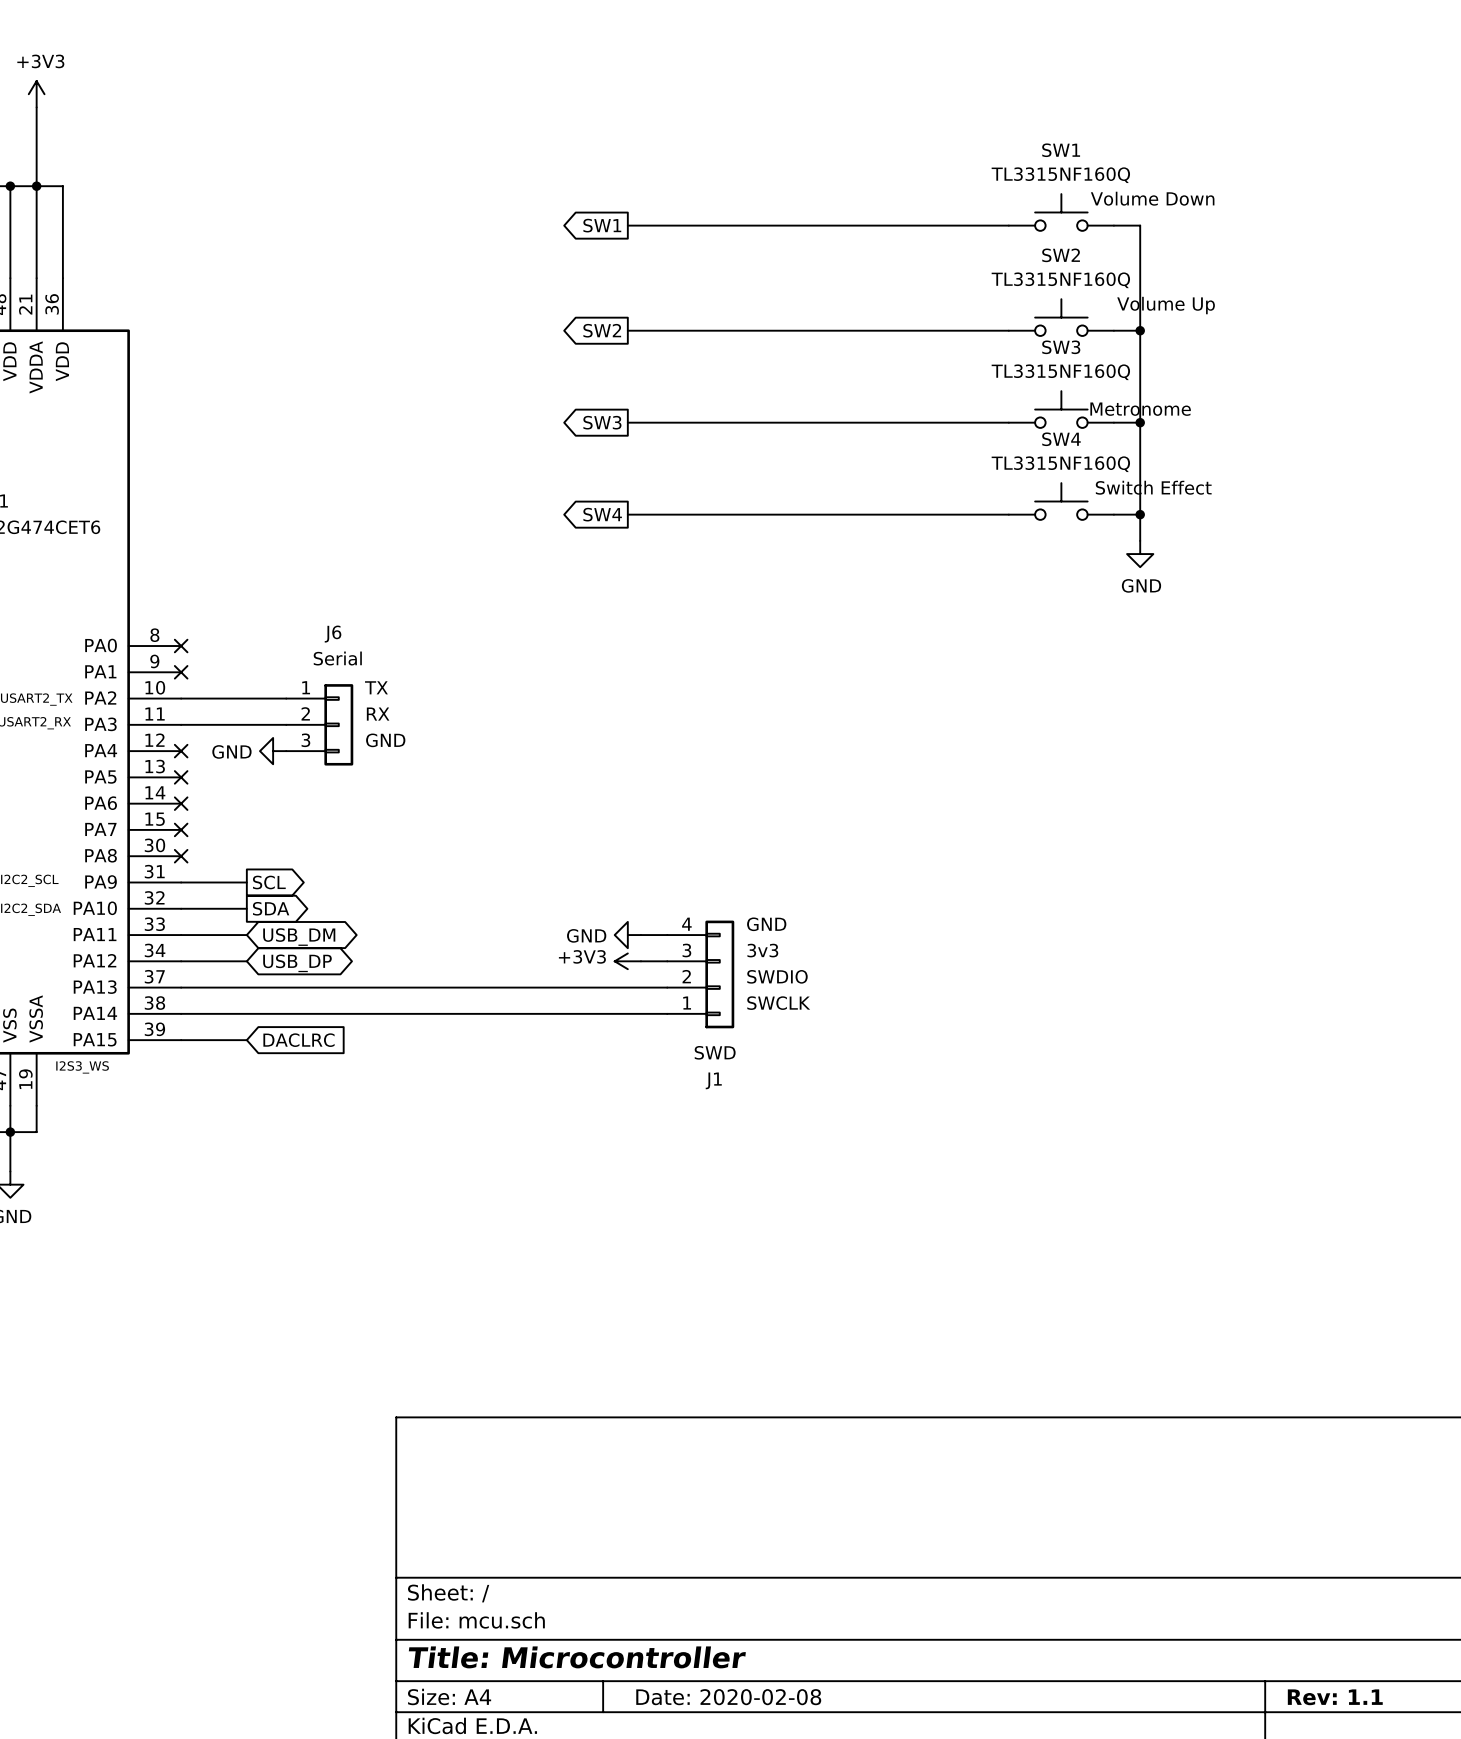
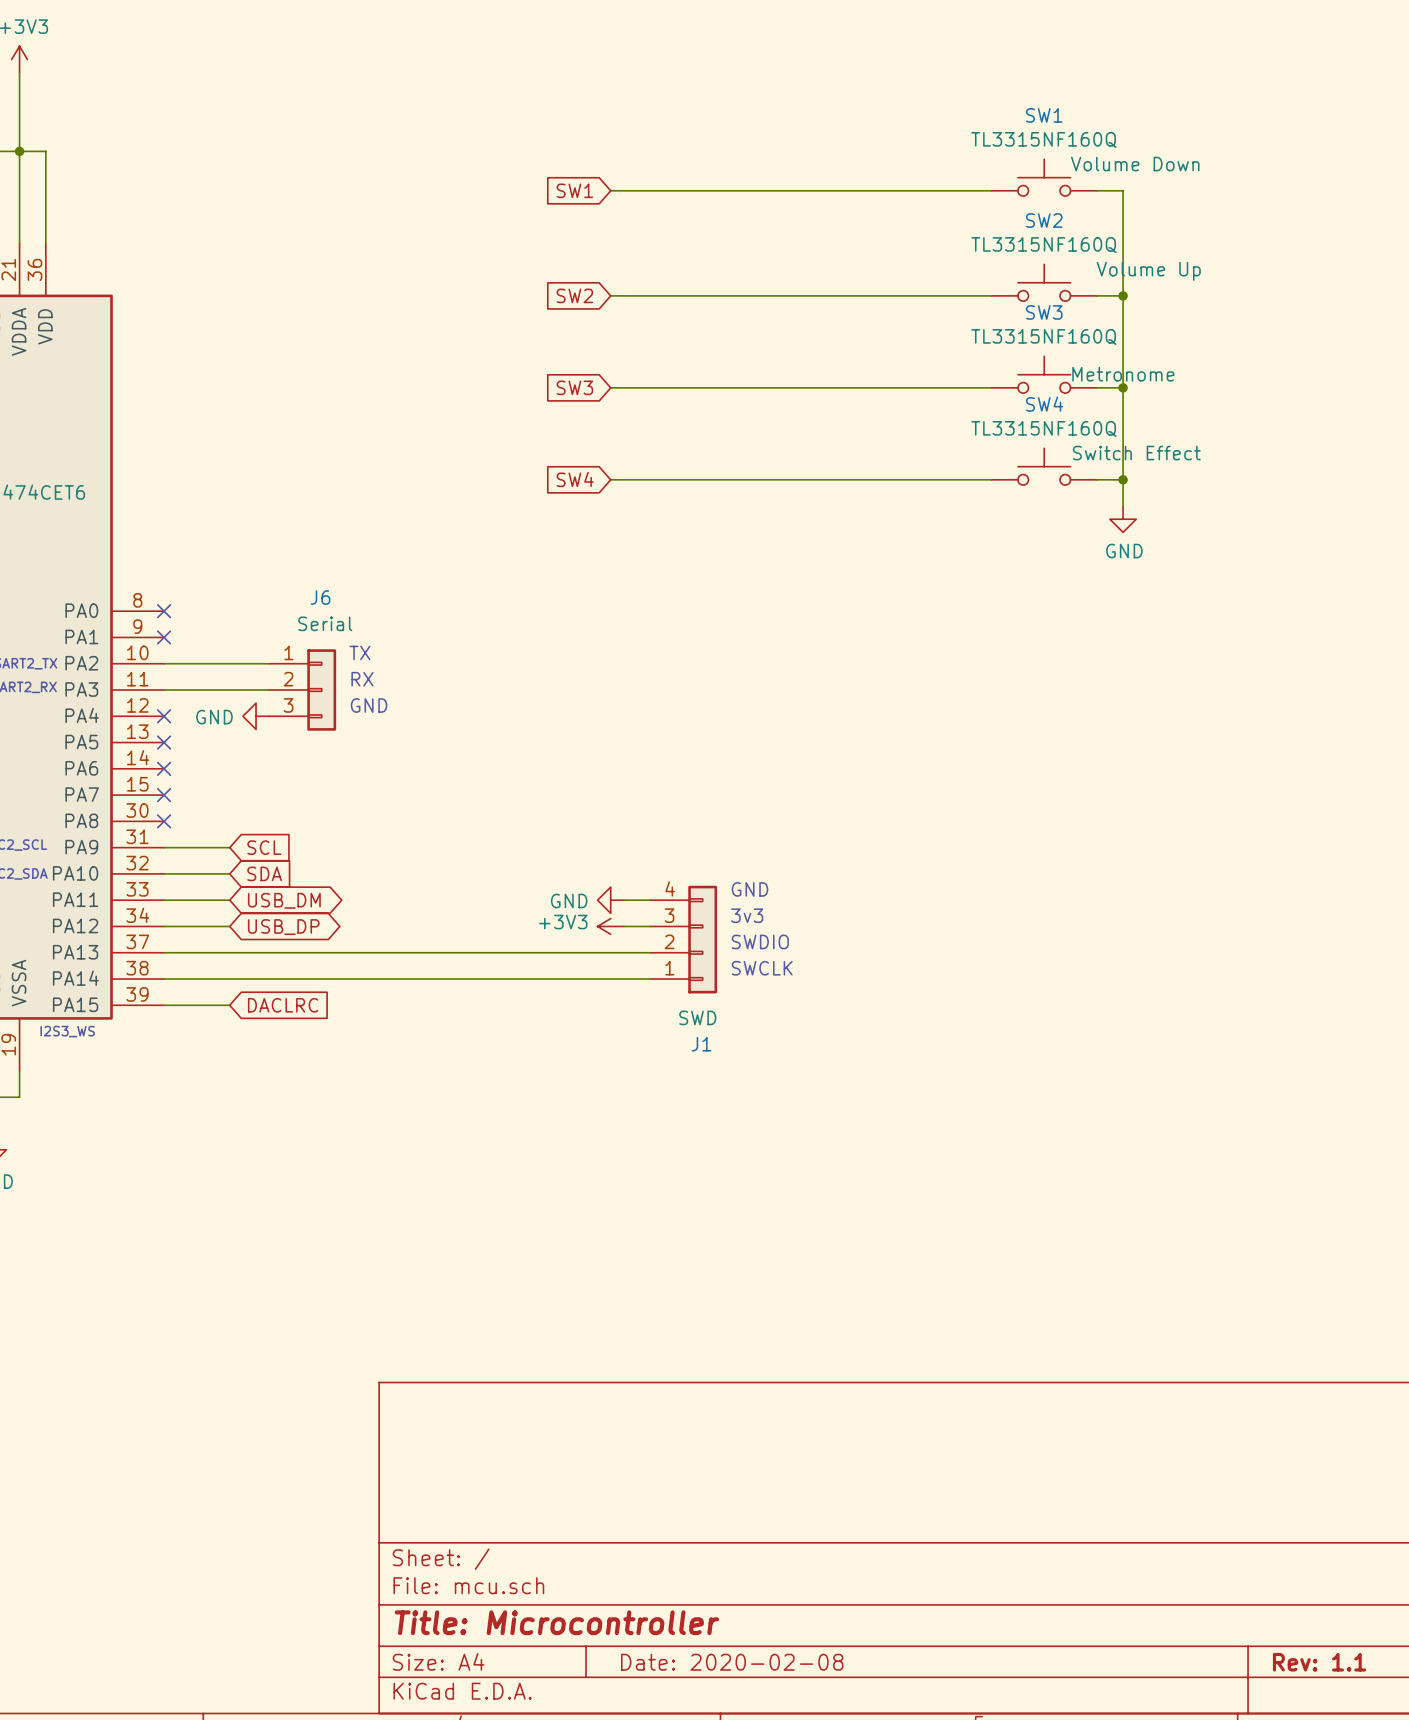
global label shape: output (602, 225) -> input (574, 190)
global label shape: output (602, 330) -> input (574, 295)
global label shape: output (602, 422) -> input (574, 387)
global label shape: output (602, 514) -> input (575, 479)
global label shape: output (269, 882) -> input (264, 847)
global label shape: output (271, 908) -> input (264, 873)

